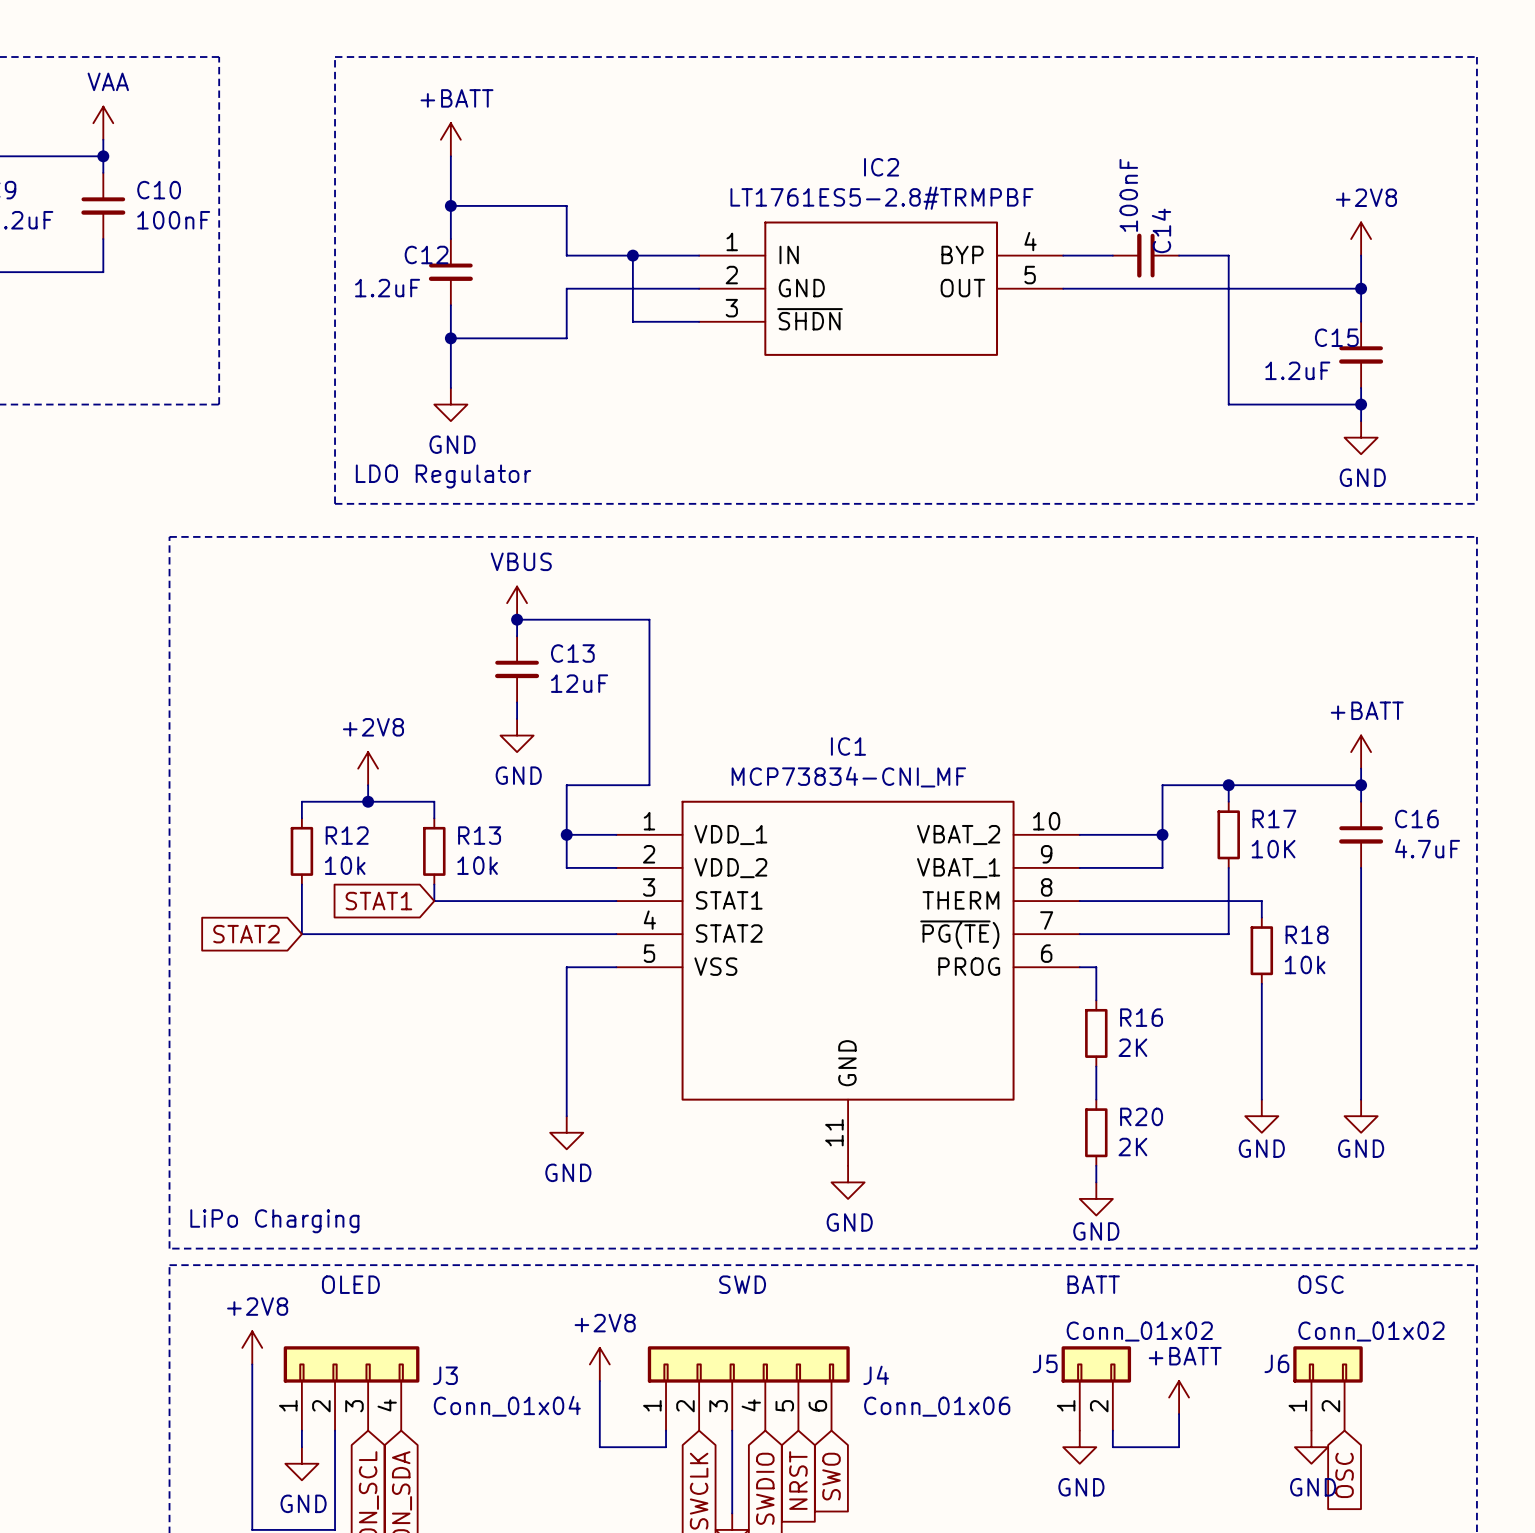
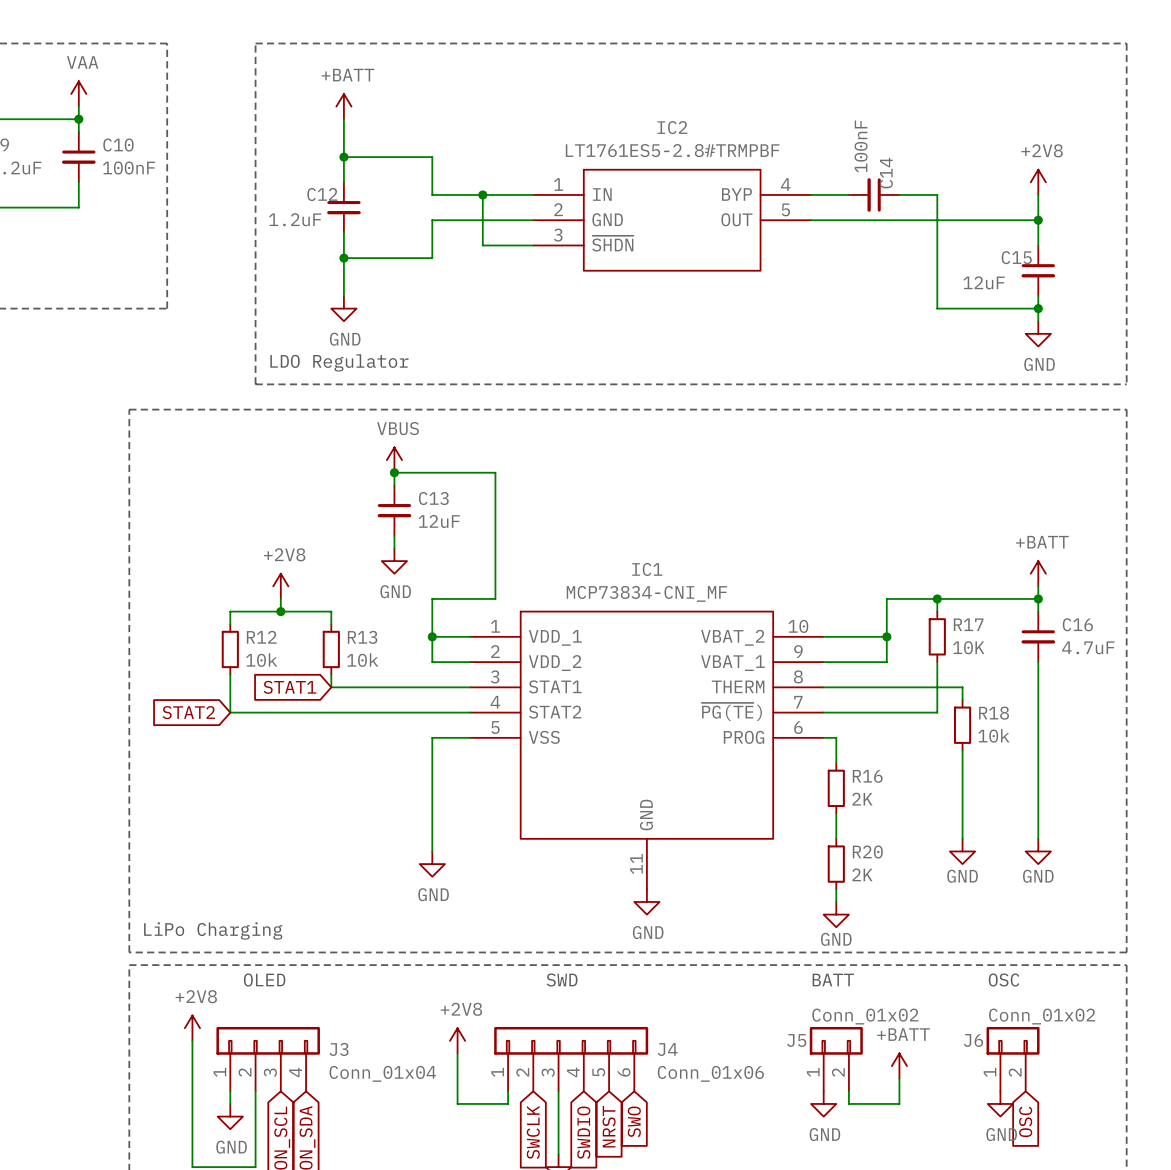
C15 value: 1.2uF (1297, 370) -> 12uF (984, 282)

